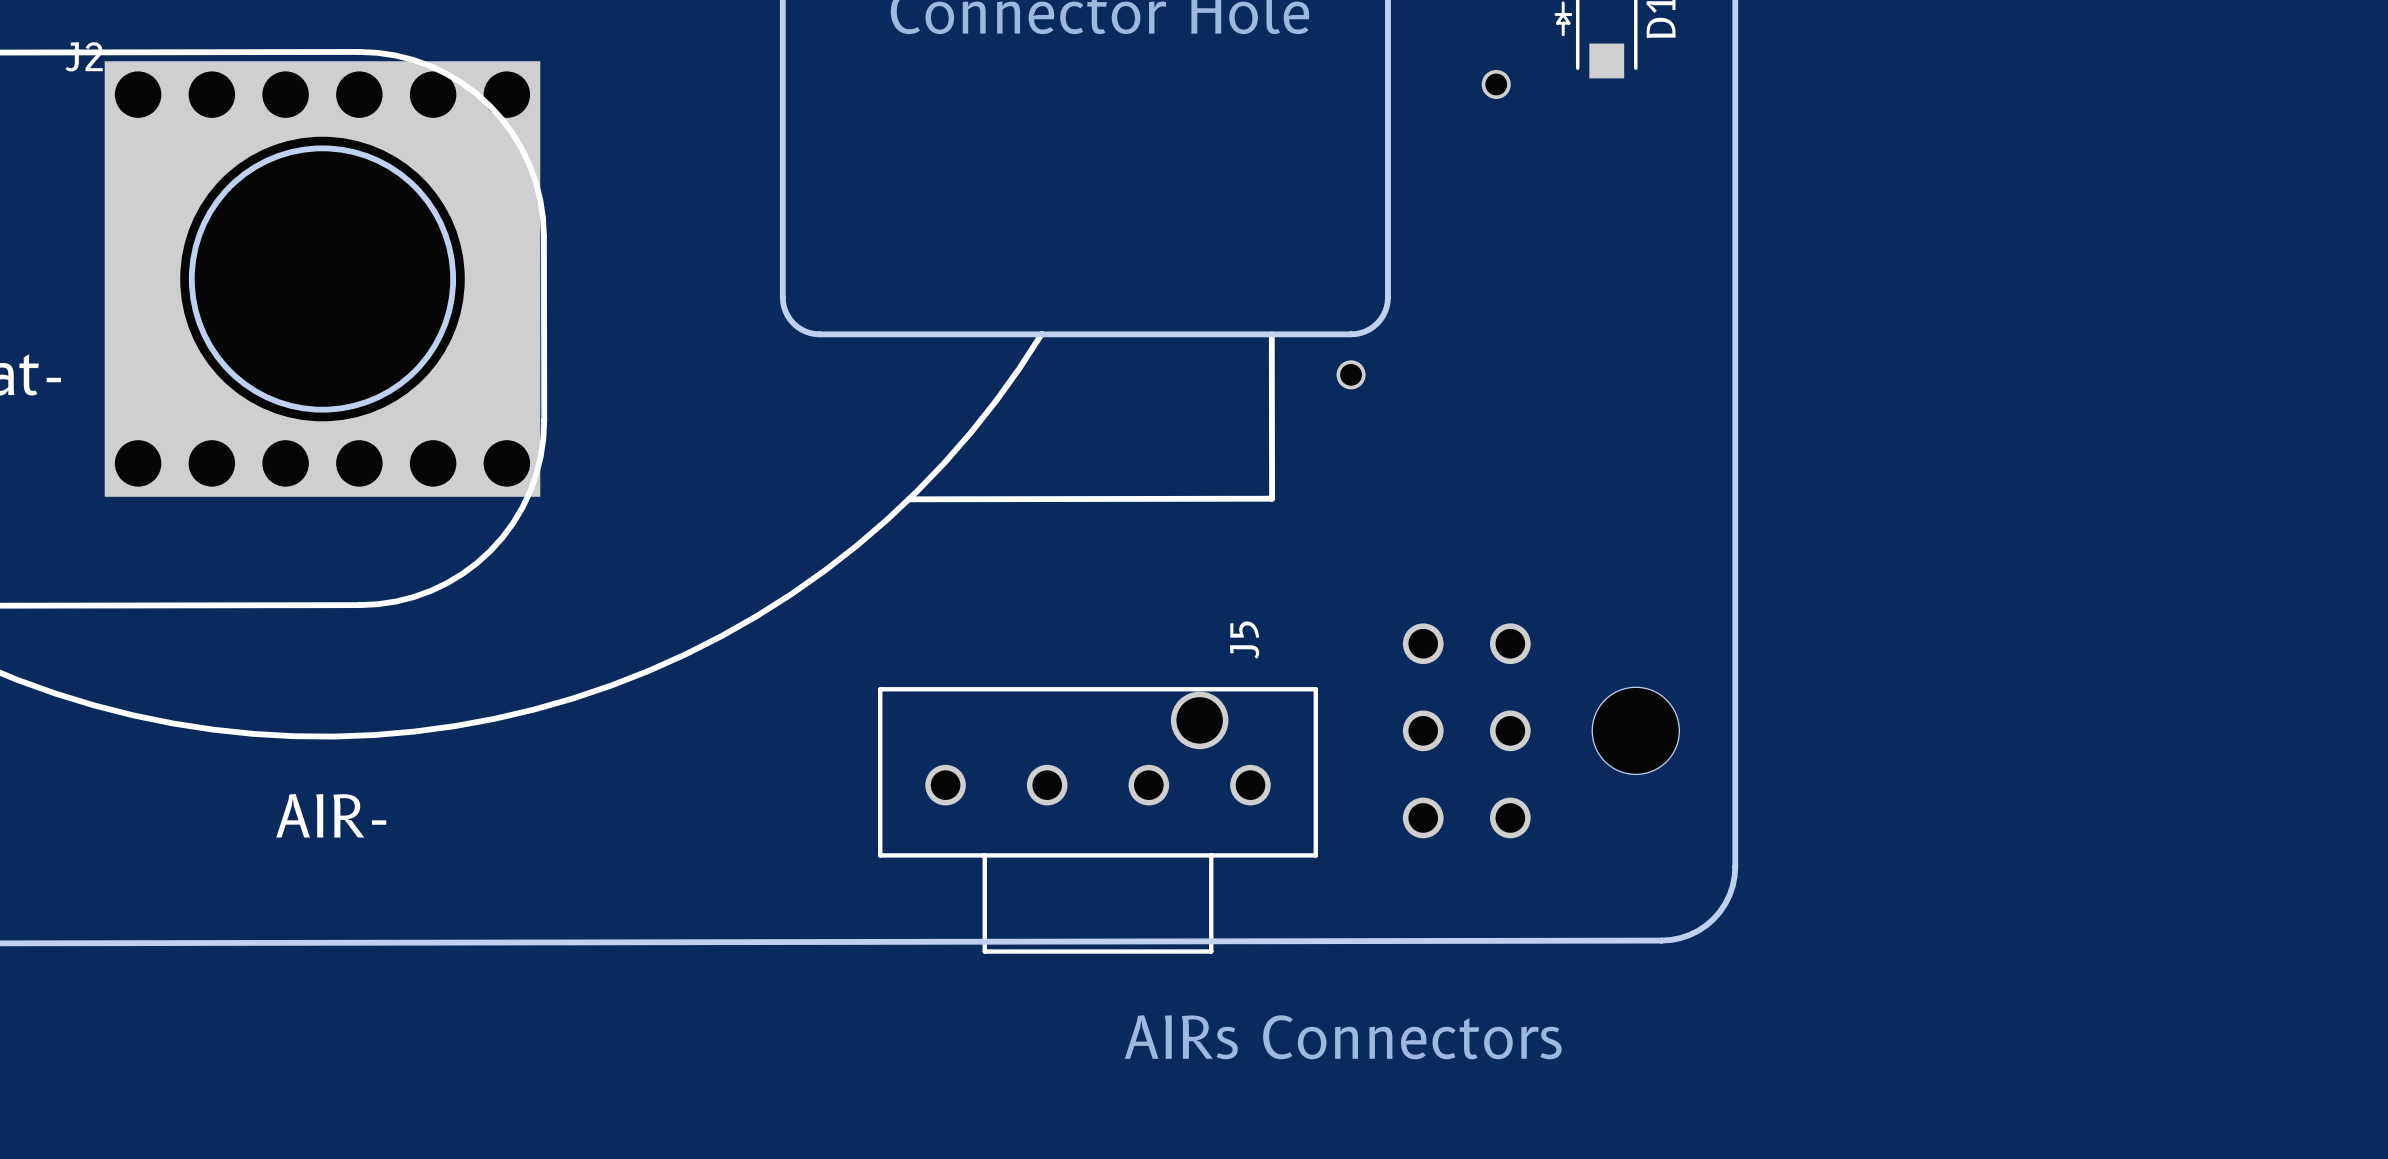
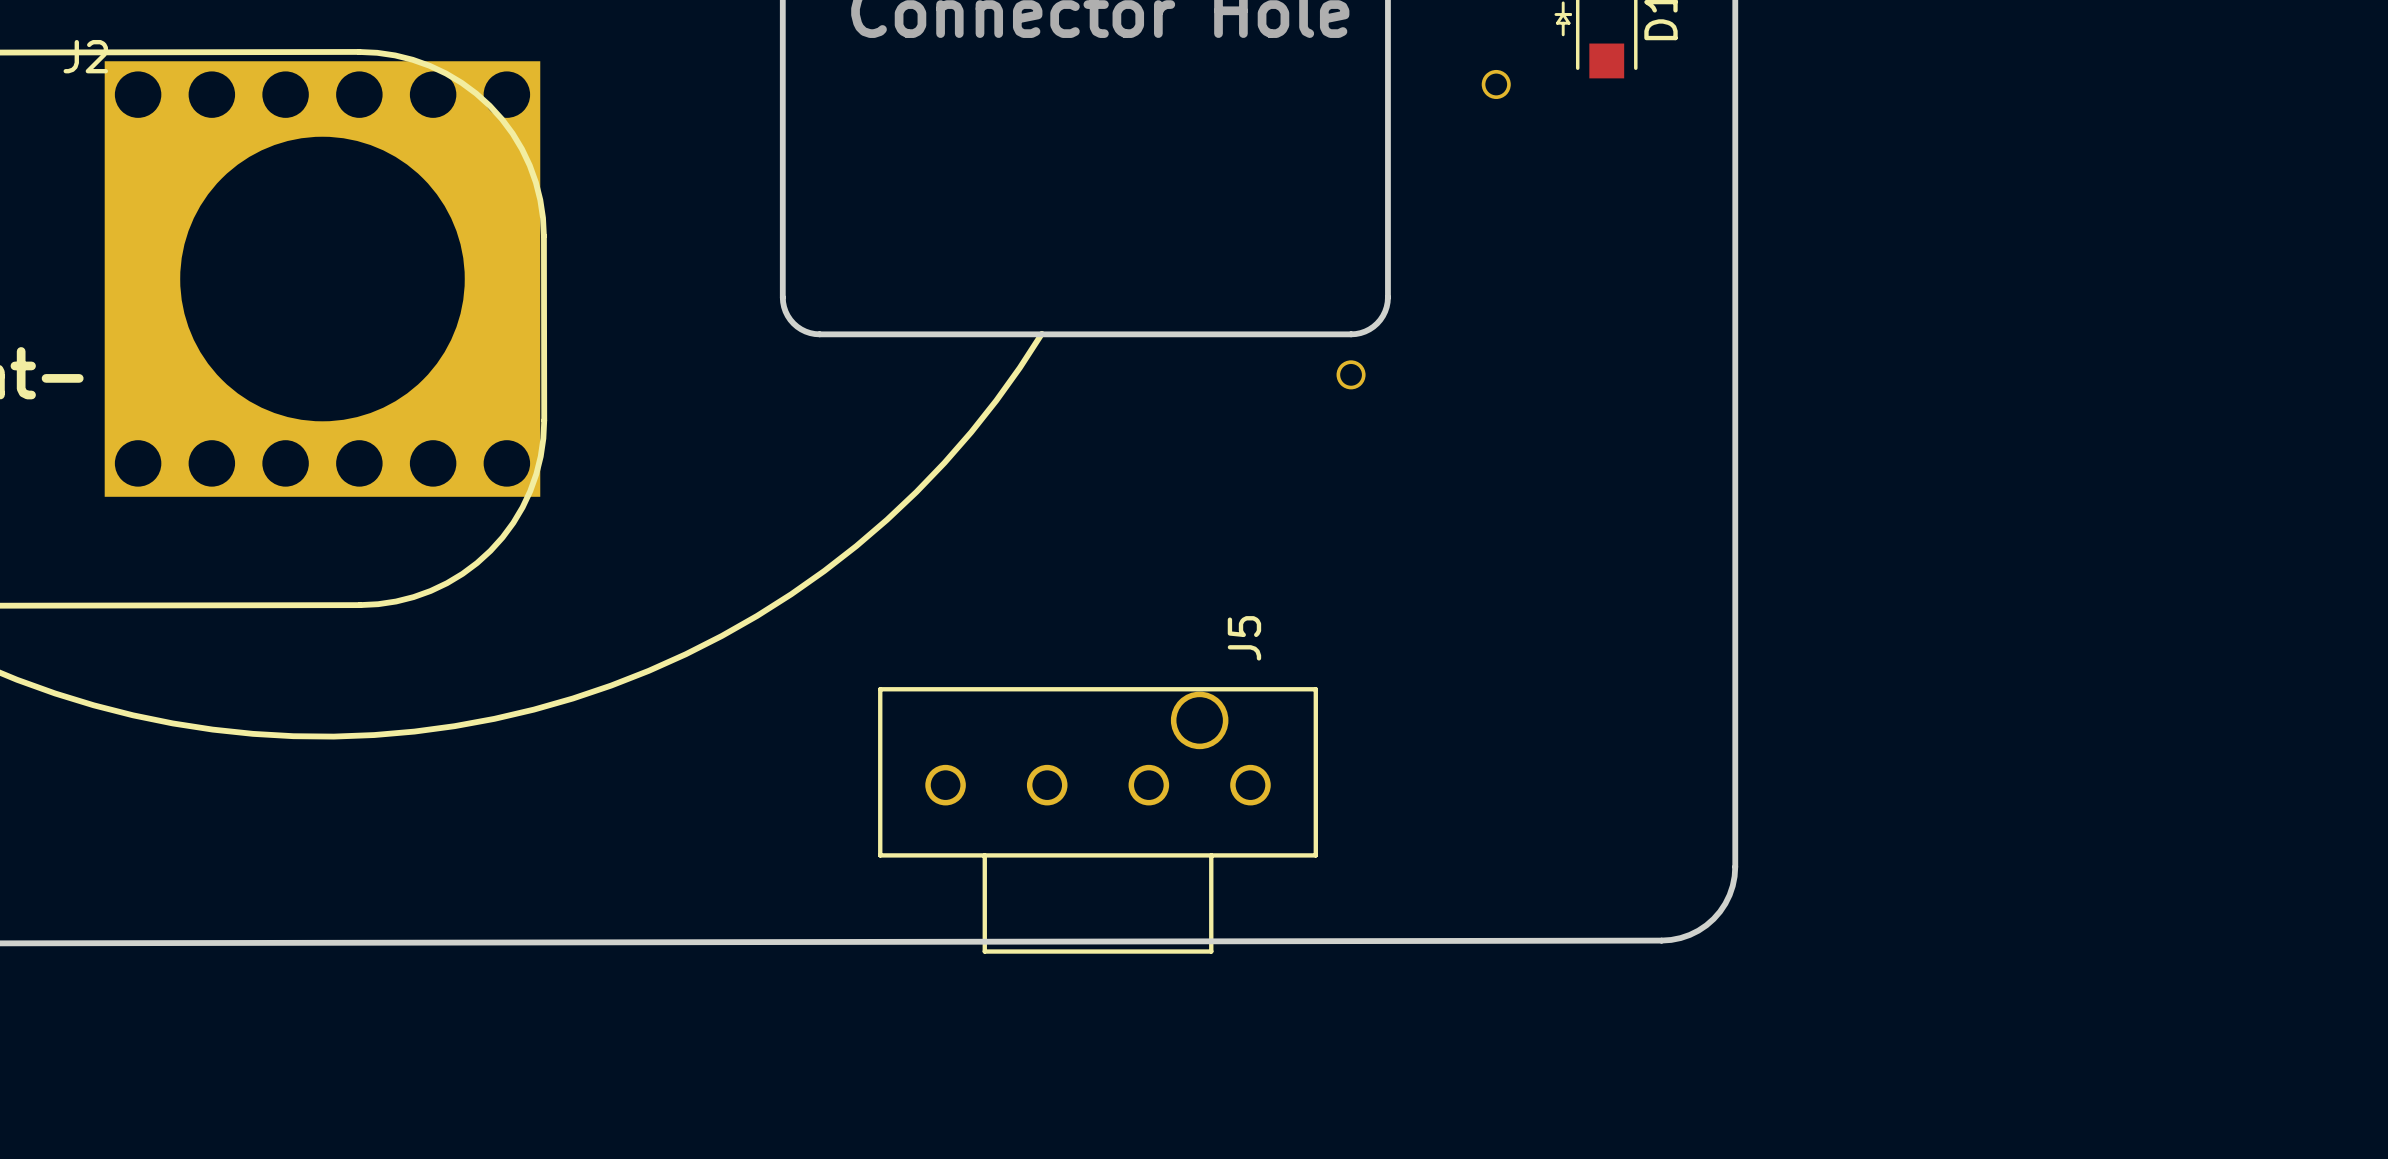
round board edge: [188, 145, 457, 413] -> none
line: (1271, 334) (1272, 498) (908, 499) -> none
part: (1541, 730) -> none
text: AIR- (331, 815) -> none
text: AIRs Connectors (1343, 1037) -> none

